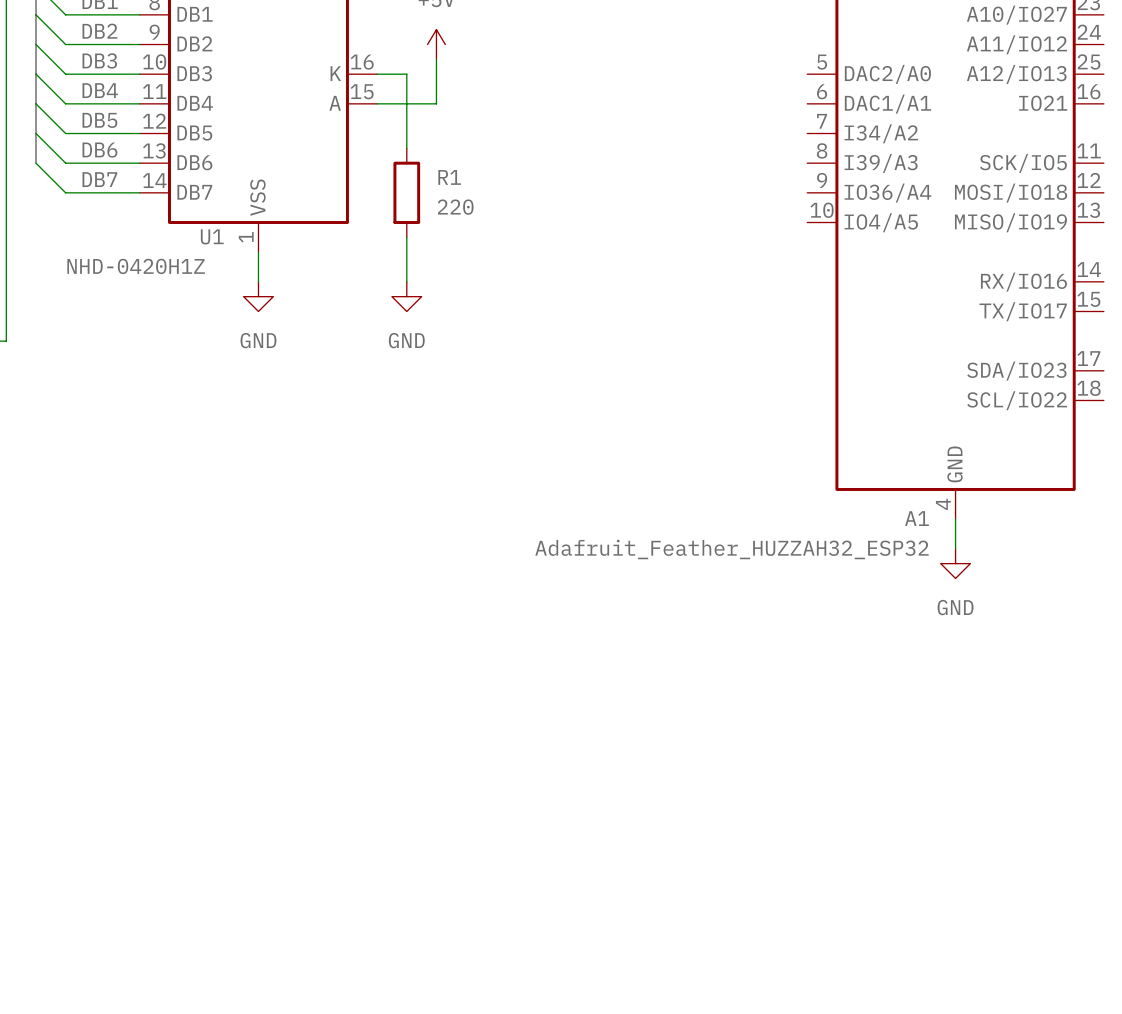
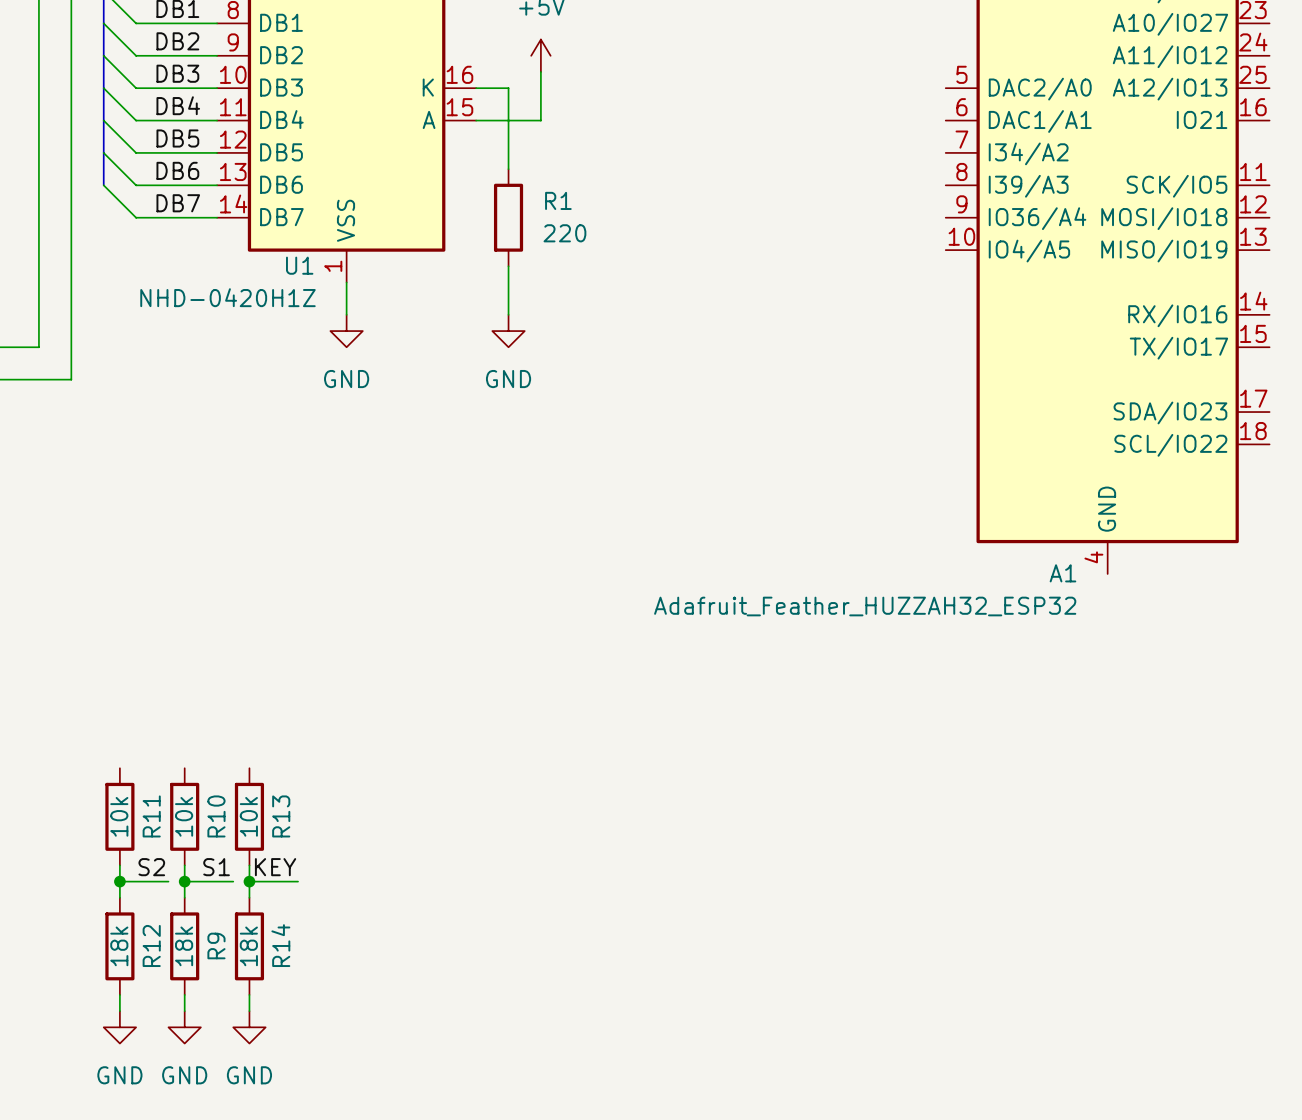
wire: (955, 519) (955, 548) -> none
power symbol: GND (955, 563) -> none
R11: none -> 10k (119, 816)
R10: none -> 10k (184, 816)
R13: none -> 10k (249, 816)
wire: none -> (119, 865) (119, 897)
wire: none -> (184, 865) (184, 897)
wire: none -> (249, 865) (249, 897)
label: none -> S2 (151, 867)
label: none -> S1 (216, 867)
label: none -> KEY (275, 867)
wire: none -> (119, 881) (168, 881)
junction: none -> (119, 881)
wire: none -> (184, 881) (233, 881)
junction: none -> (184, 881)
wire: none -> (249, 881) (298, 881)
junction: none -> (249, 881)
R12: none -> 18k (119, 946)
R9: none -> 18k (184, 946)
R14: none -> 18k (249, 946)
wire: none -> (119, 994) (119, 1011)
wire: none -> (184, 994) (184, 1011)
wire: none -> (249, 994) (249, 1011)
power symbol: none -> GND (119, 1027)
power symbol: none -> GND (184, 1027)
power symbol: none -> GND (249, 1027)

